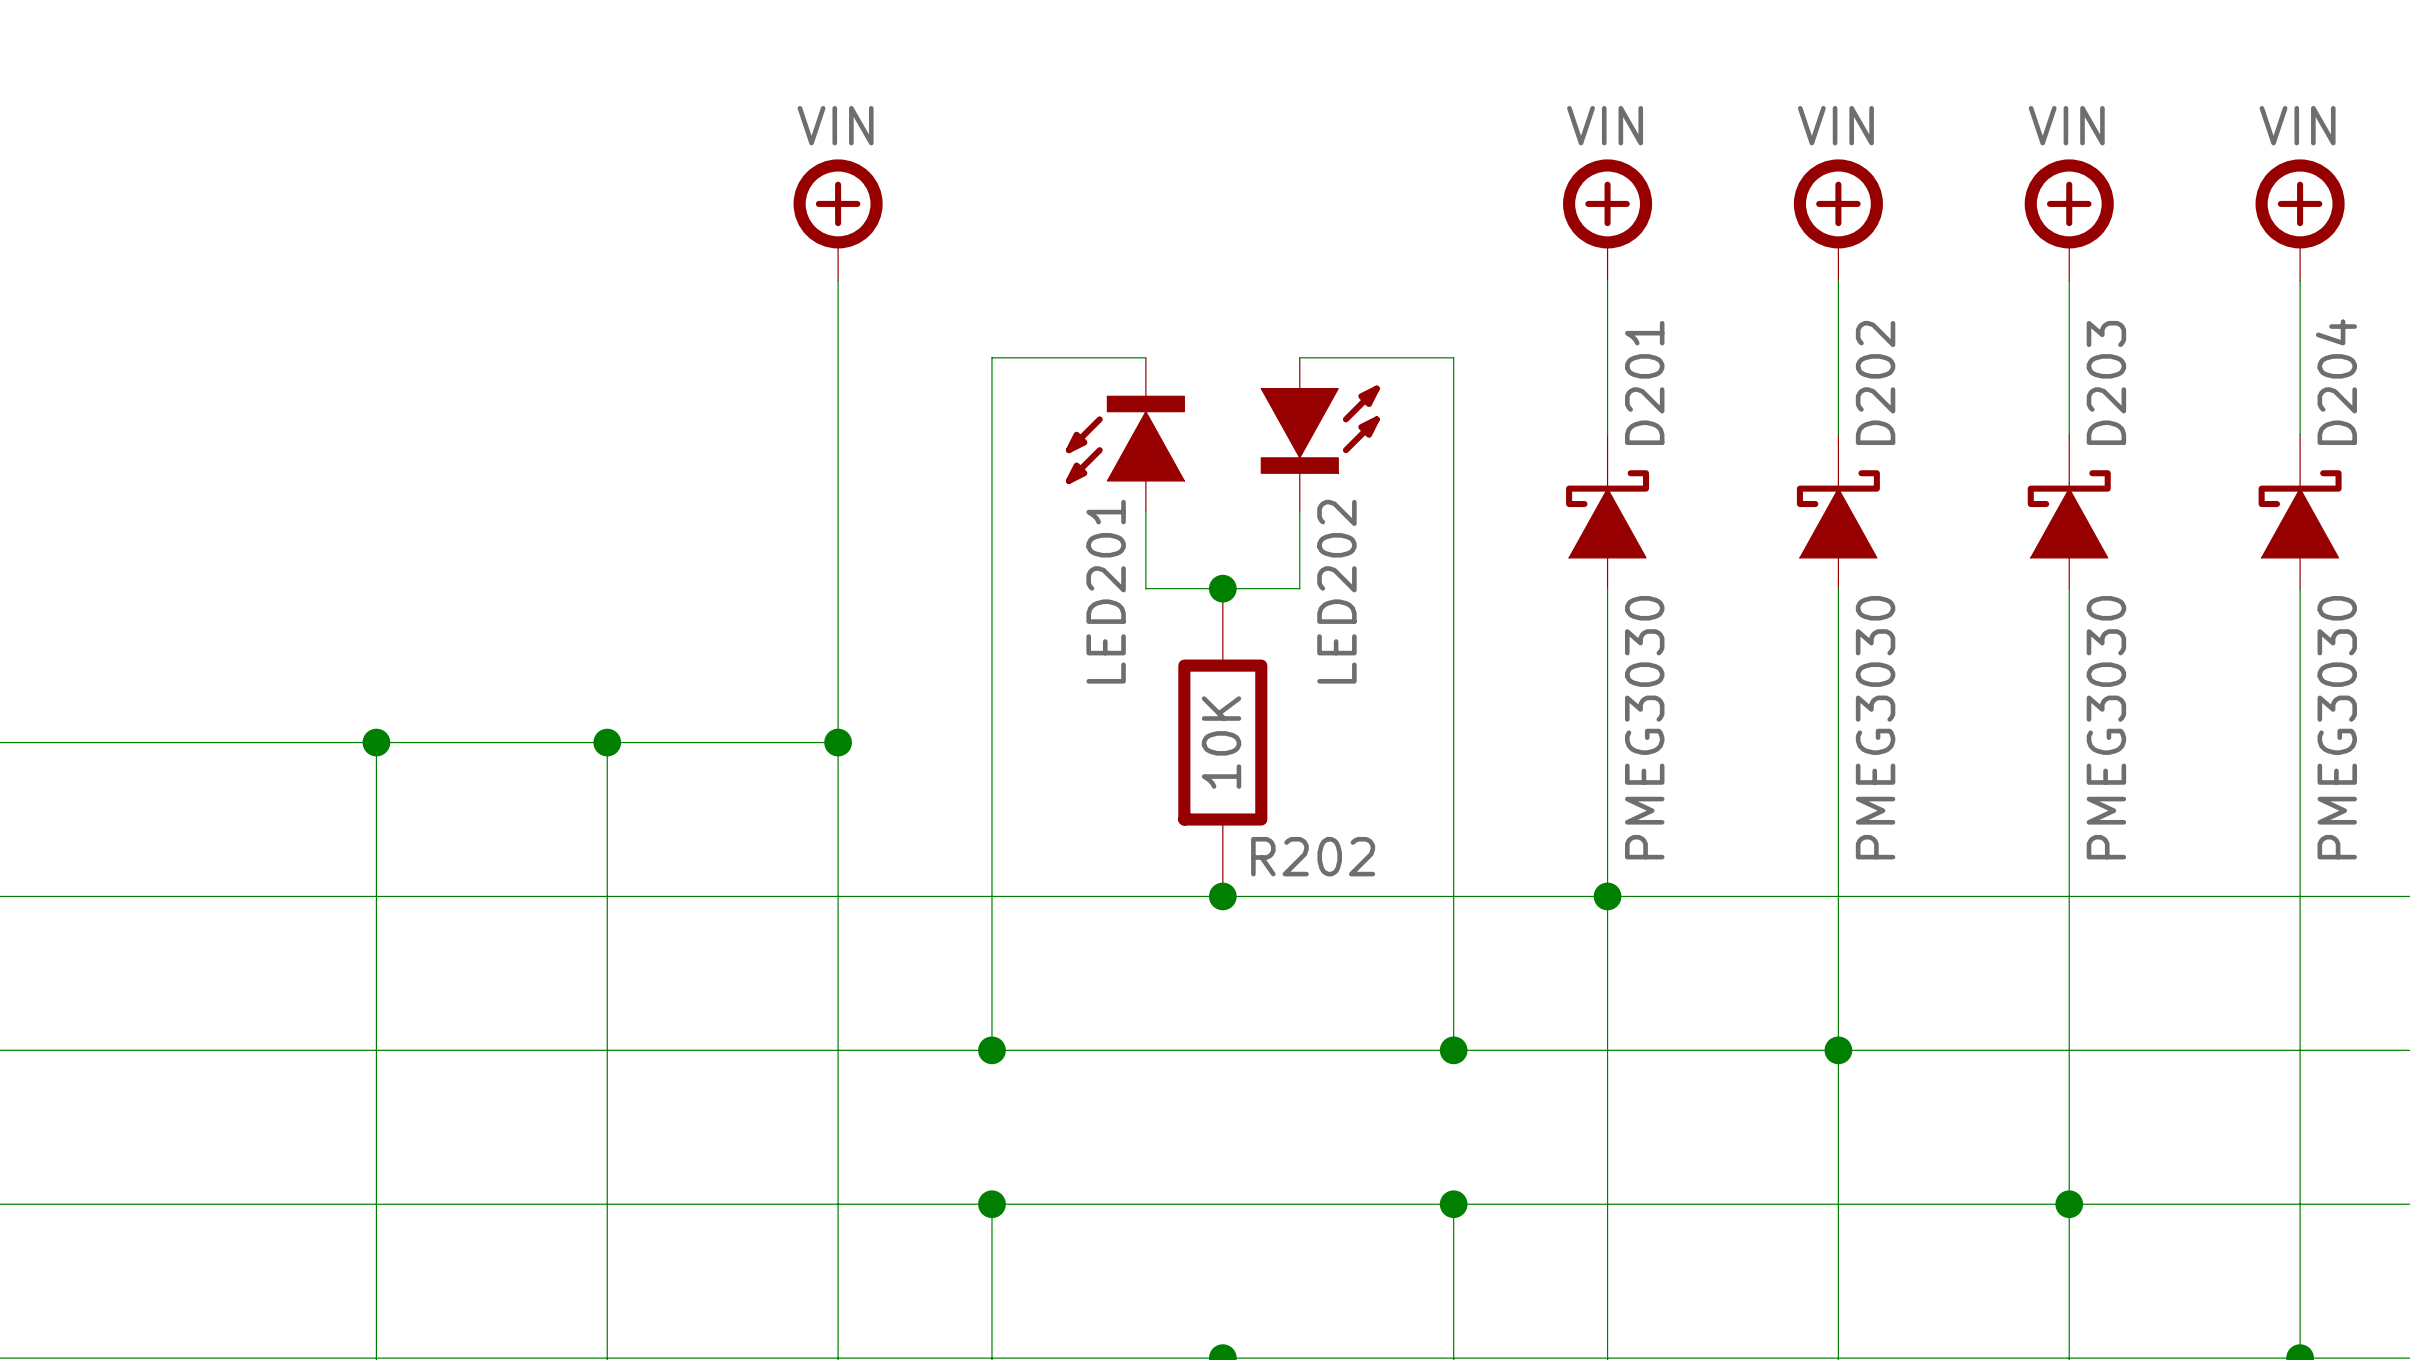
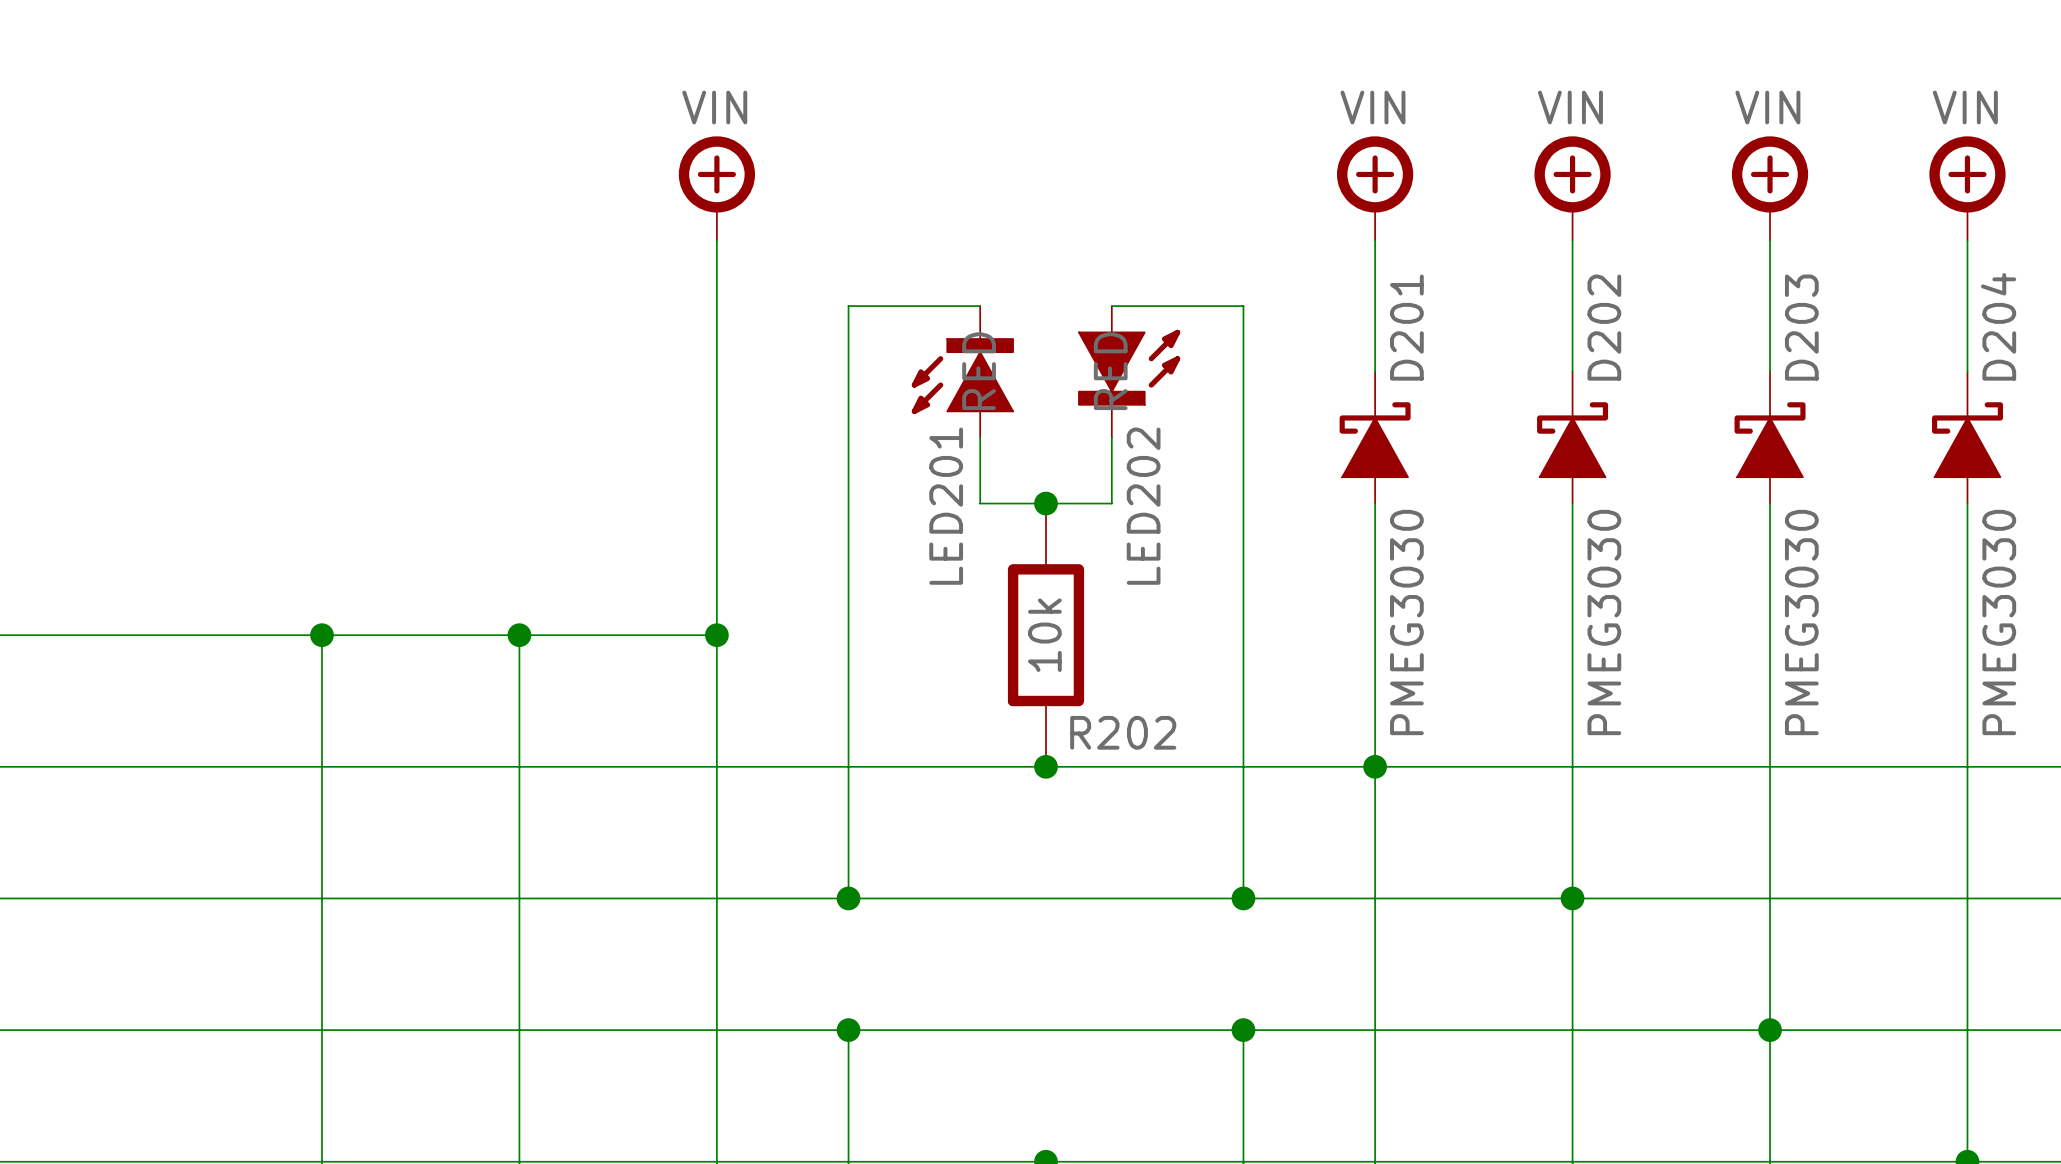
LED202 value: none -> RED (979, 371)
LED201 value: none -> RED (1110, 371)
R202 value: 10K (1221, 742) -> 10k (1044, 635)

